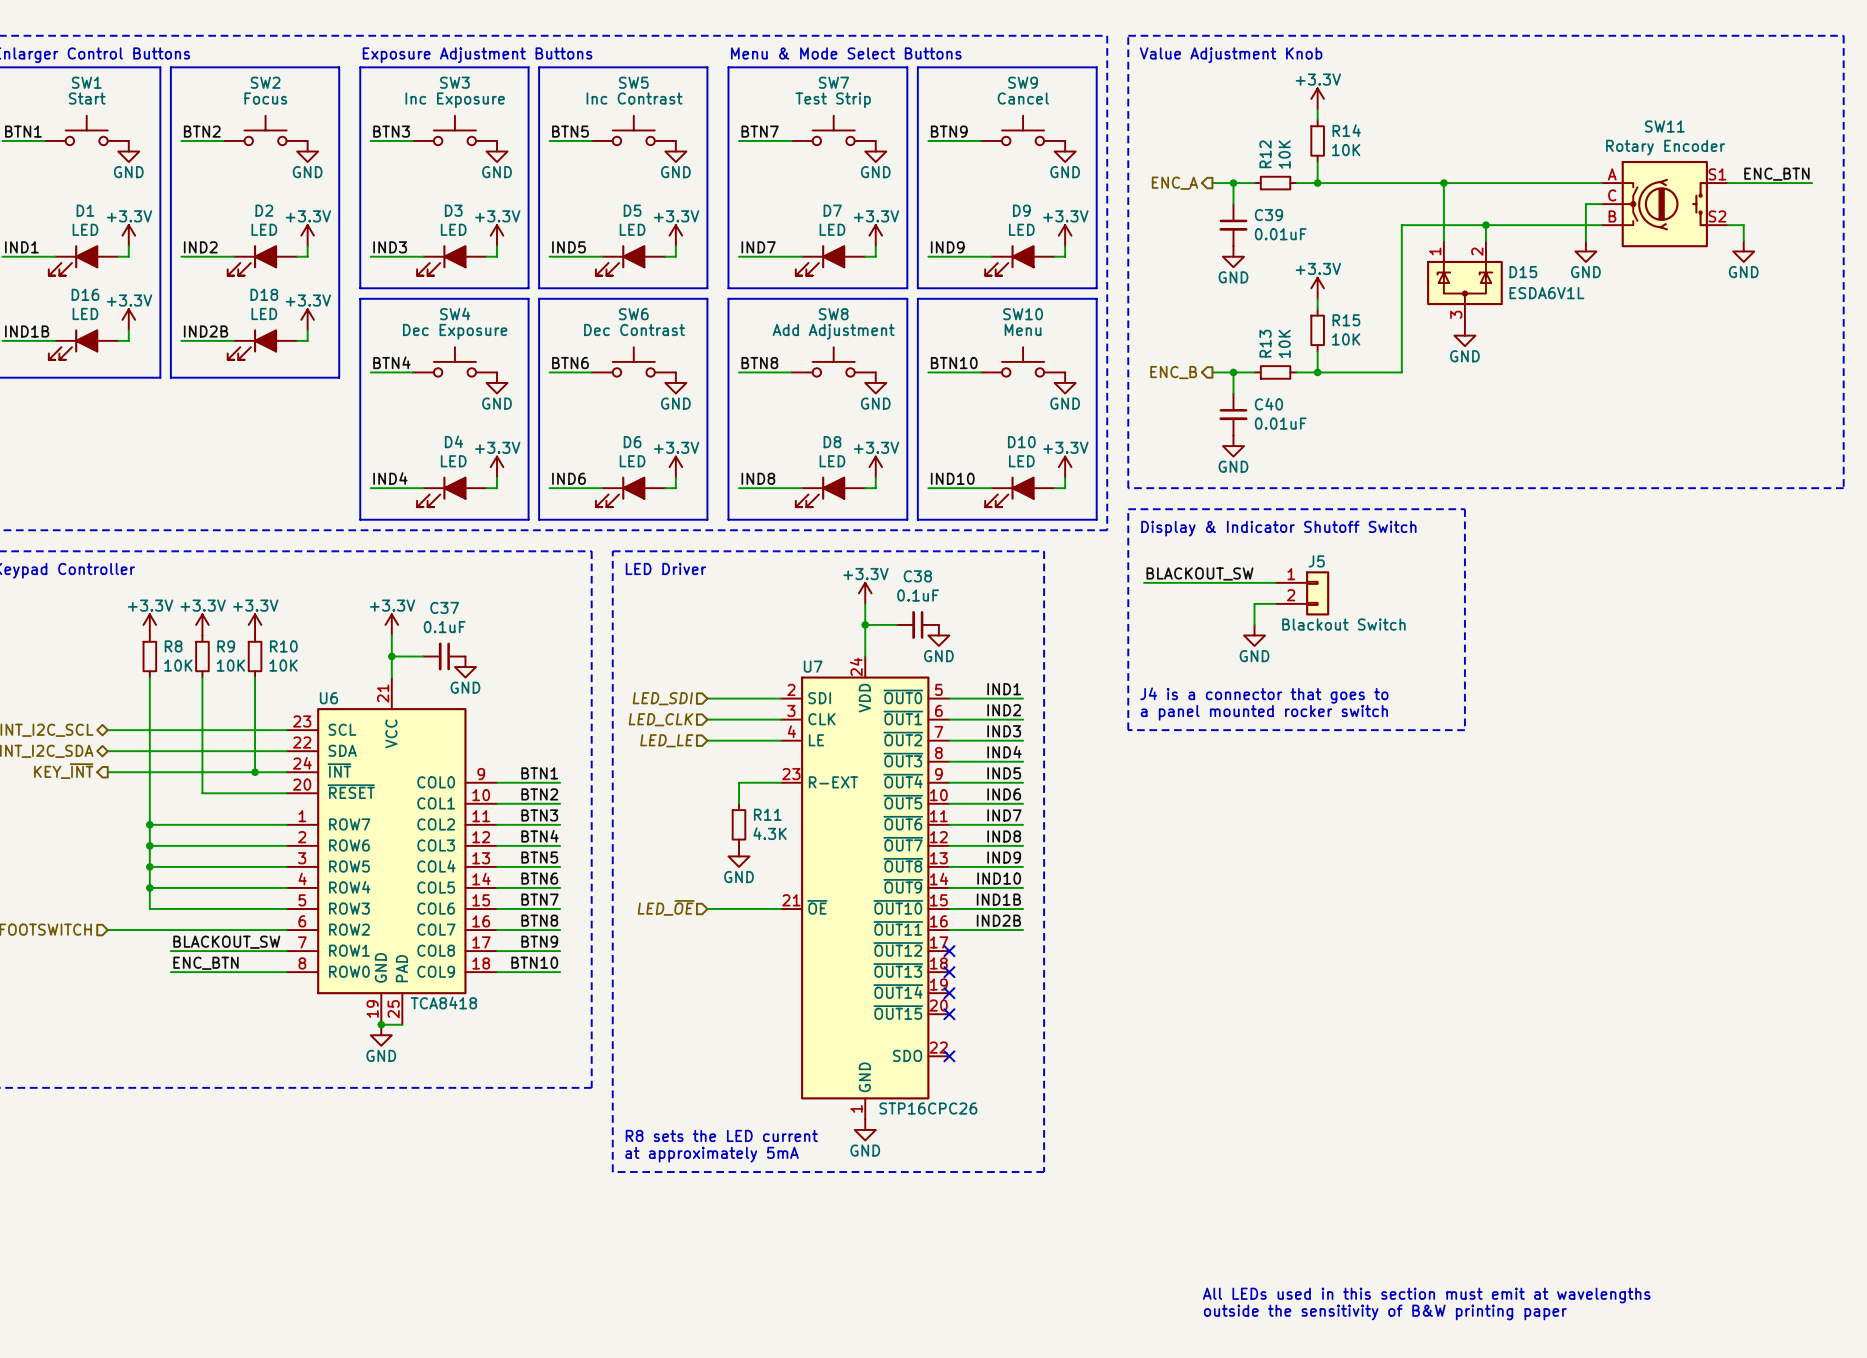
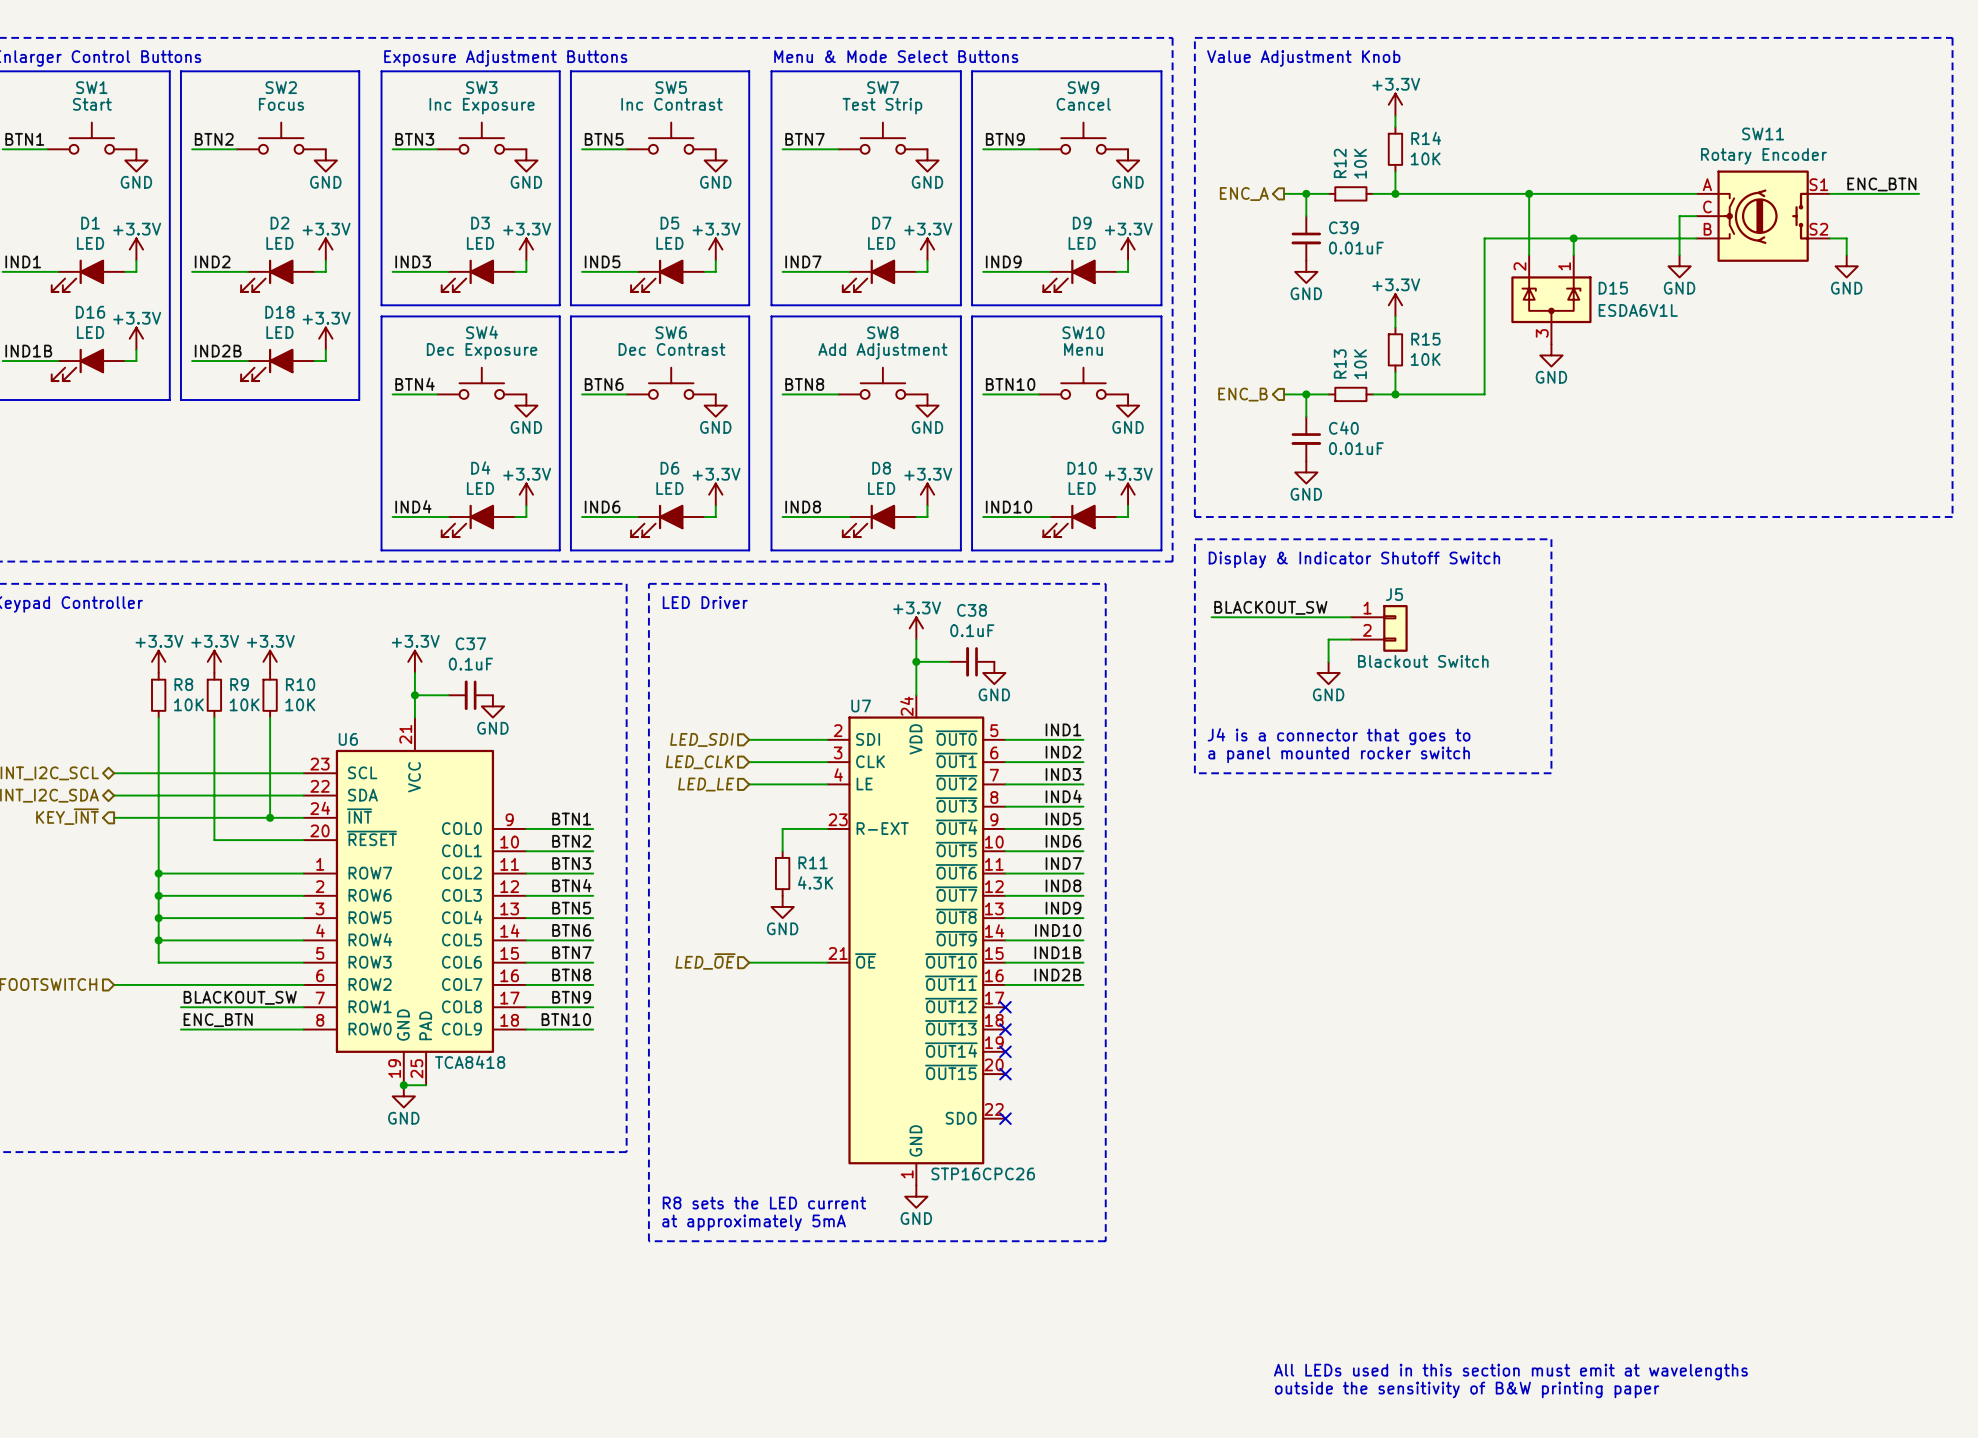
D15 flip: as is (1464, 283) -> left-right (1551, 299)

